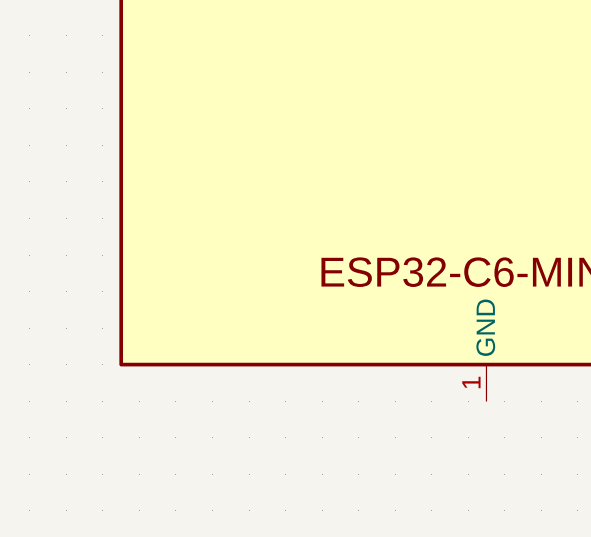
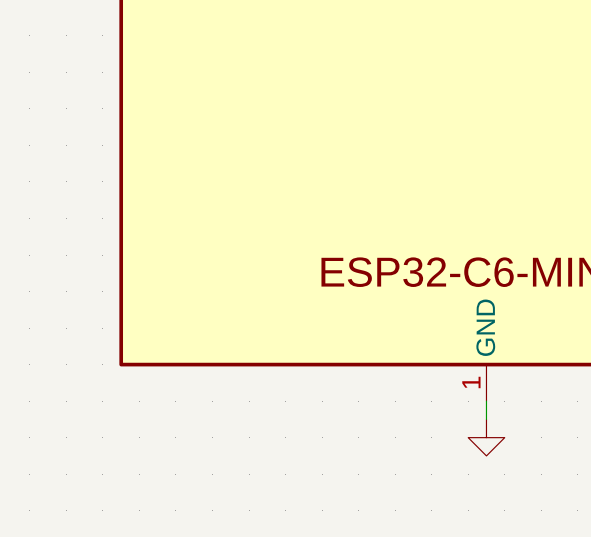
wire: none -> (486, 401) (486, 419)
power symbol: none -> (486, 437)

